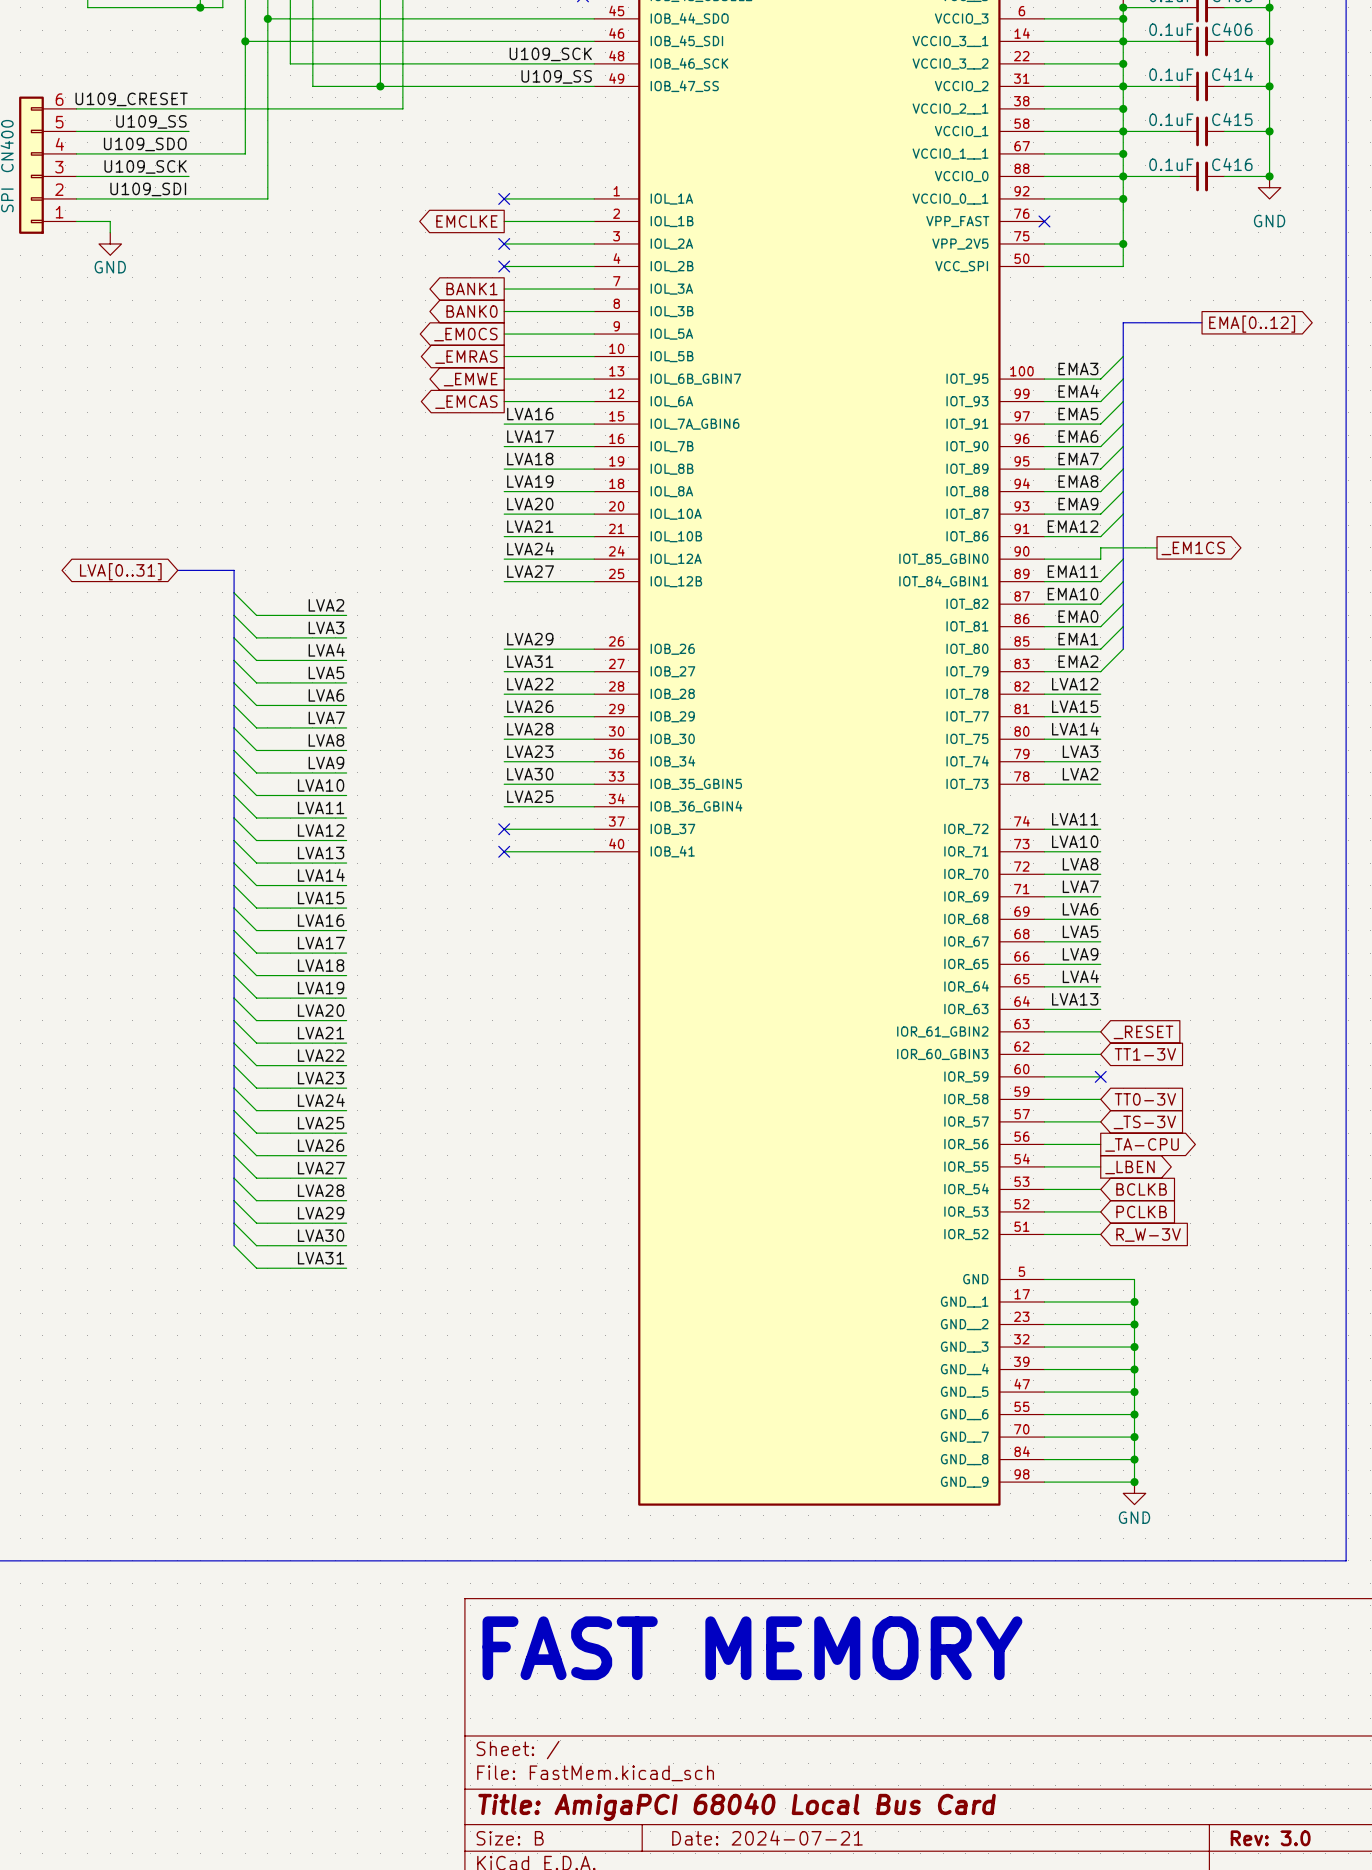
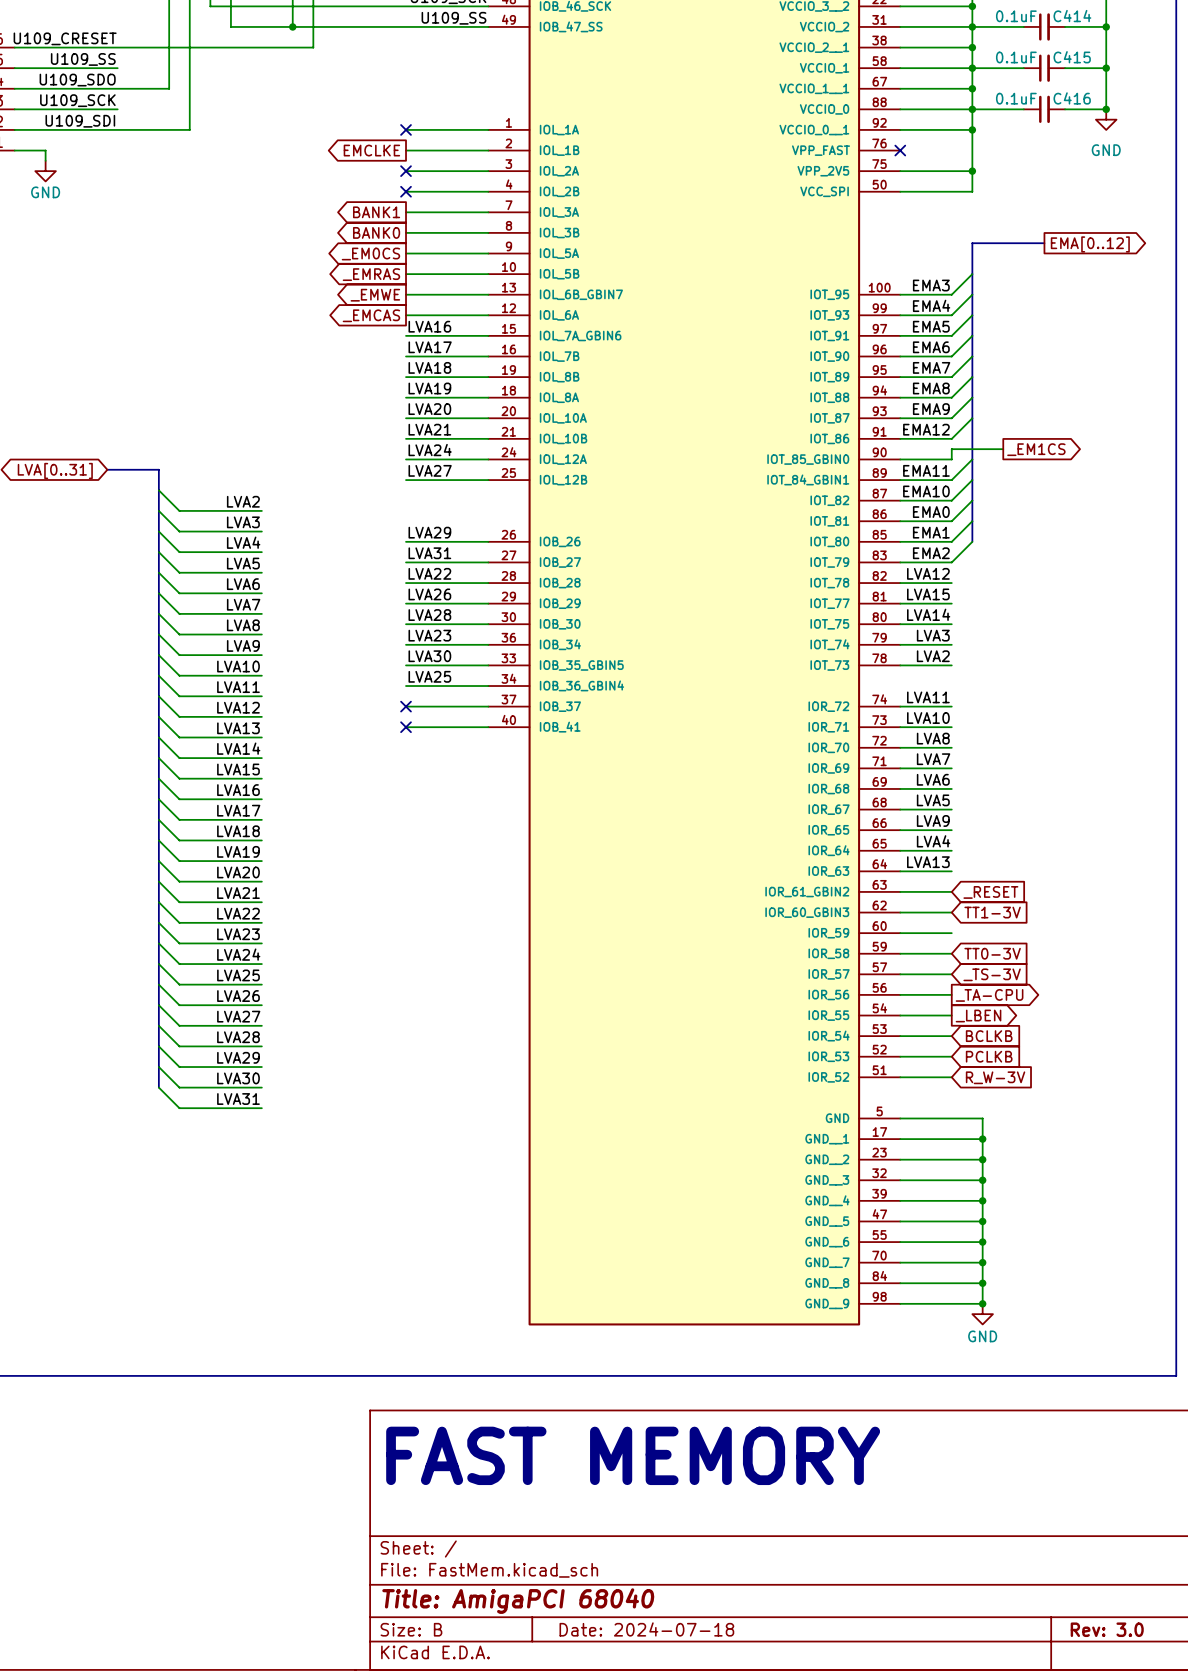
no-connect mark: (1100, 1076) -> none
title block: Title: AmigaPCI 68040 Local Bus Card (737, 1806) -> Title: AmigaPCI 68040 (518, 1601)
title block: Date: 2024-07-21 (767, 1837) -> Date: 2024-07-18 (646, 1629)

